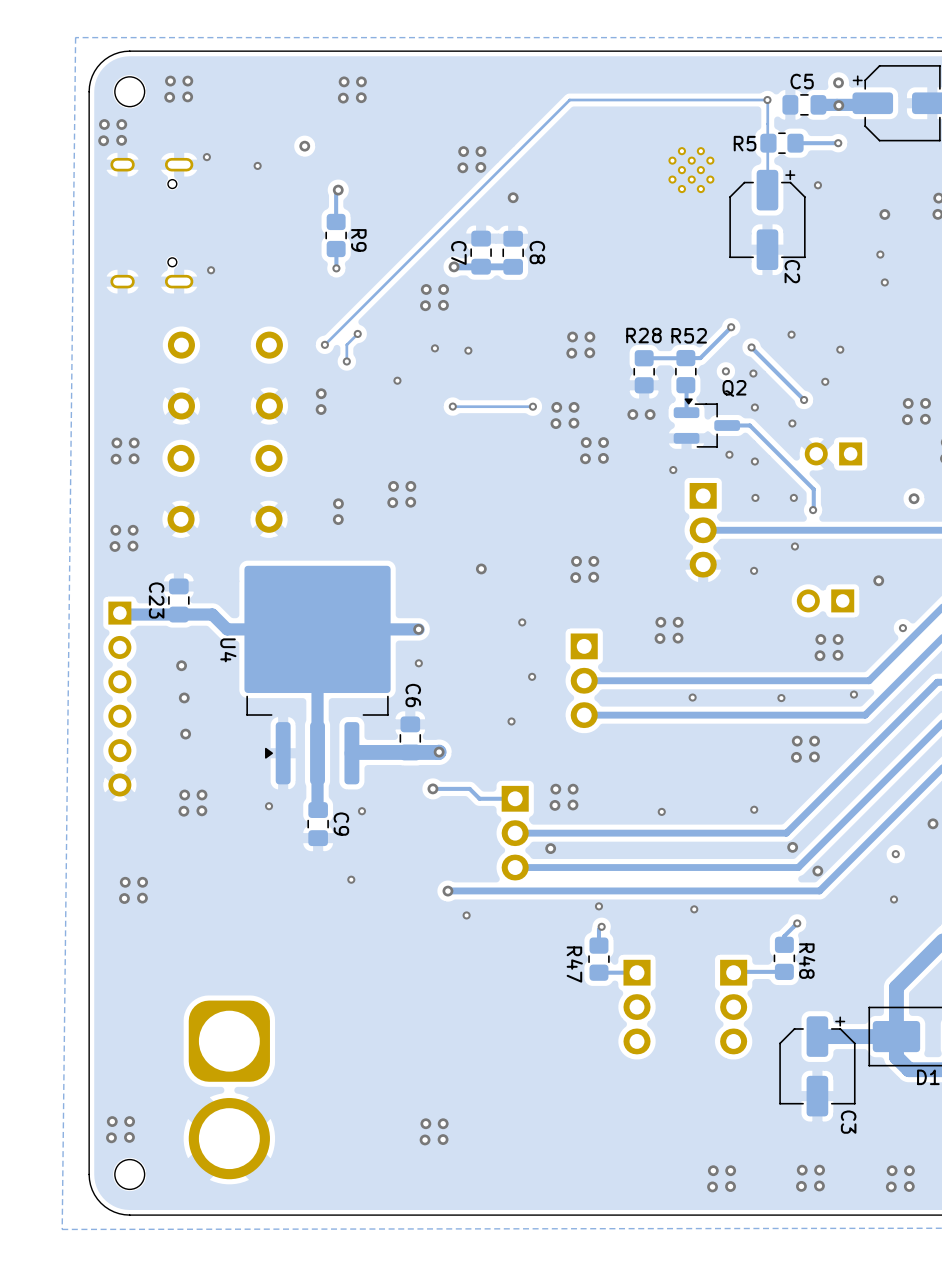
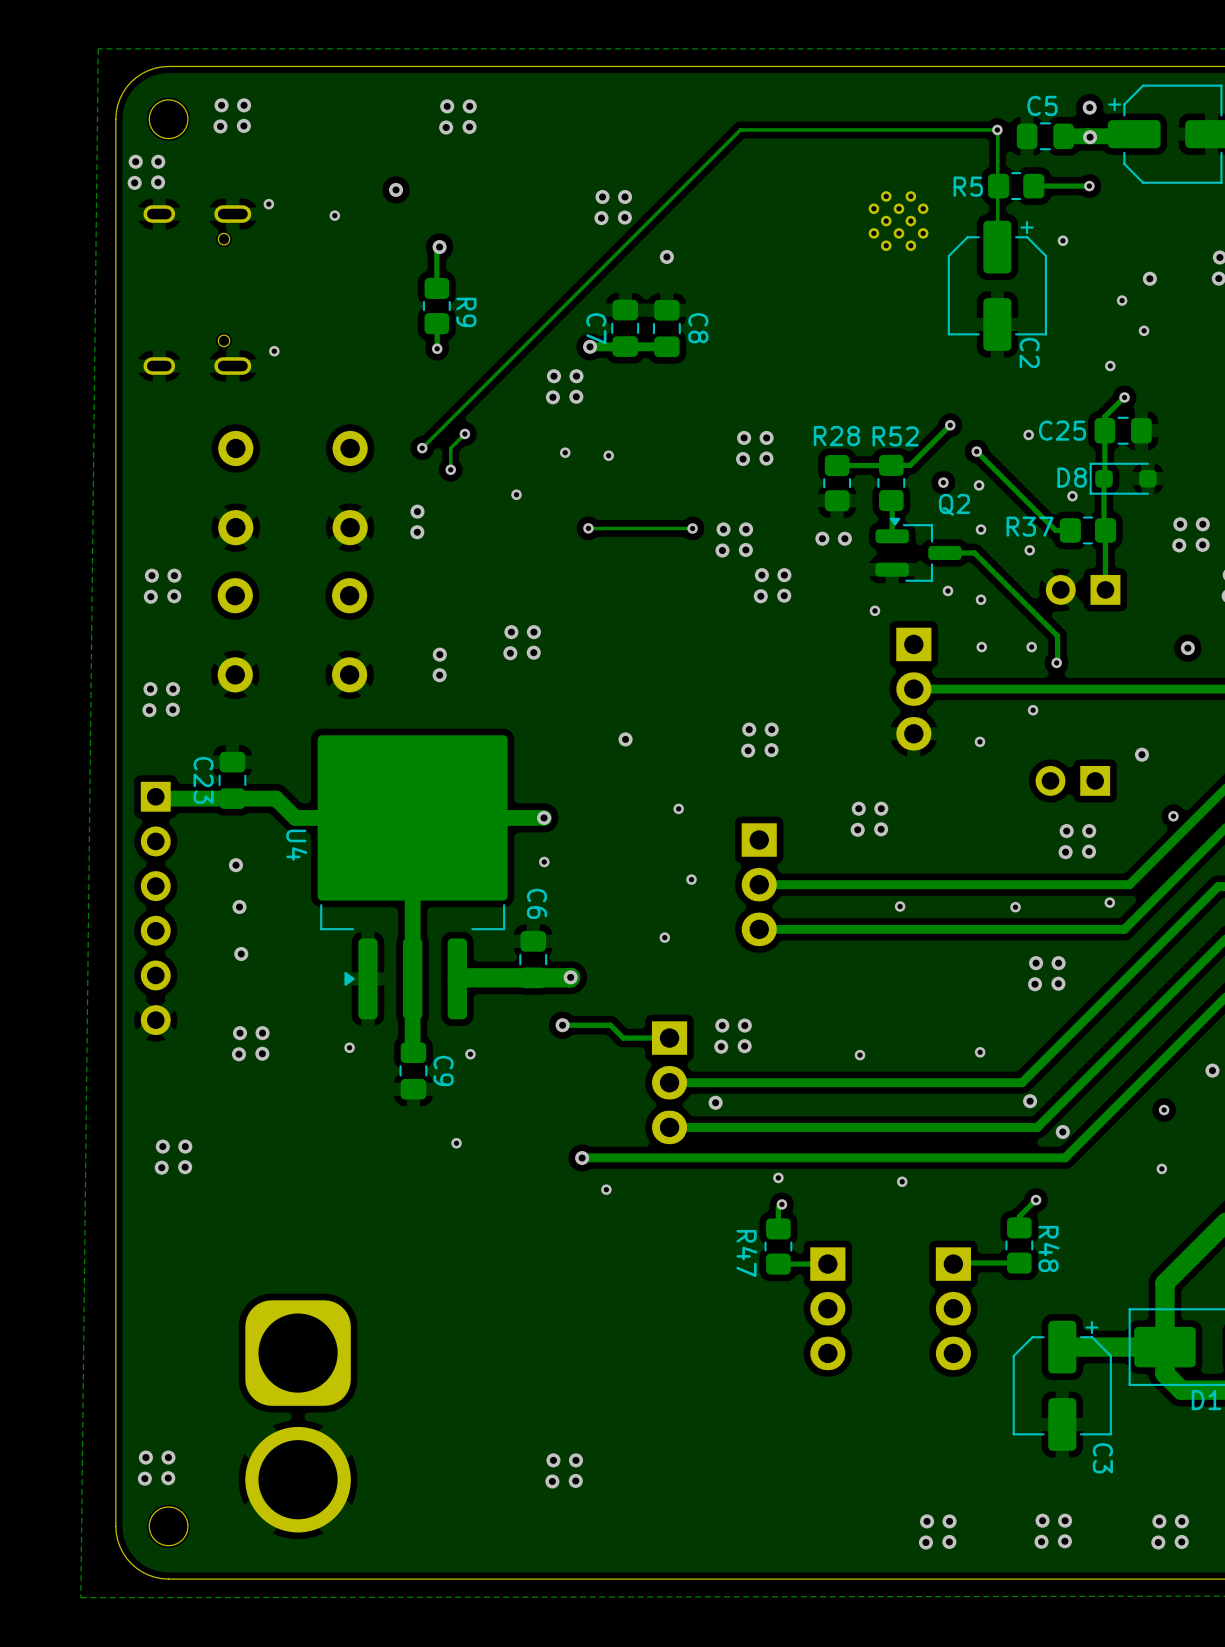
via: none -> (1122, 300)
via: none -> (1110, 366)
via: (884, 282) -> none
track: none -> (1124, 397) (1104, 416) (1104, 527)
via: none -> (1124, 397)
C25: none -> (1123, 430)
via: (840, 349) -> none
D8: none -> (1123, 478)
track: none -> (1044, 519) (1055, 530) (1070, 530)
via: (804, 399) -> none
track: none -> (1103, 527) (1105, 529) (1105, 589)
R37: none -> (1087, 530)

